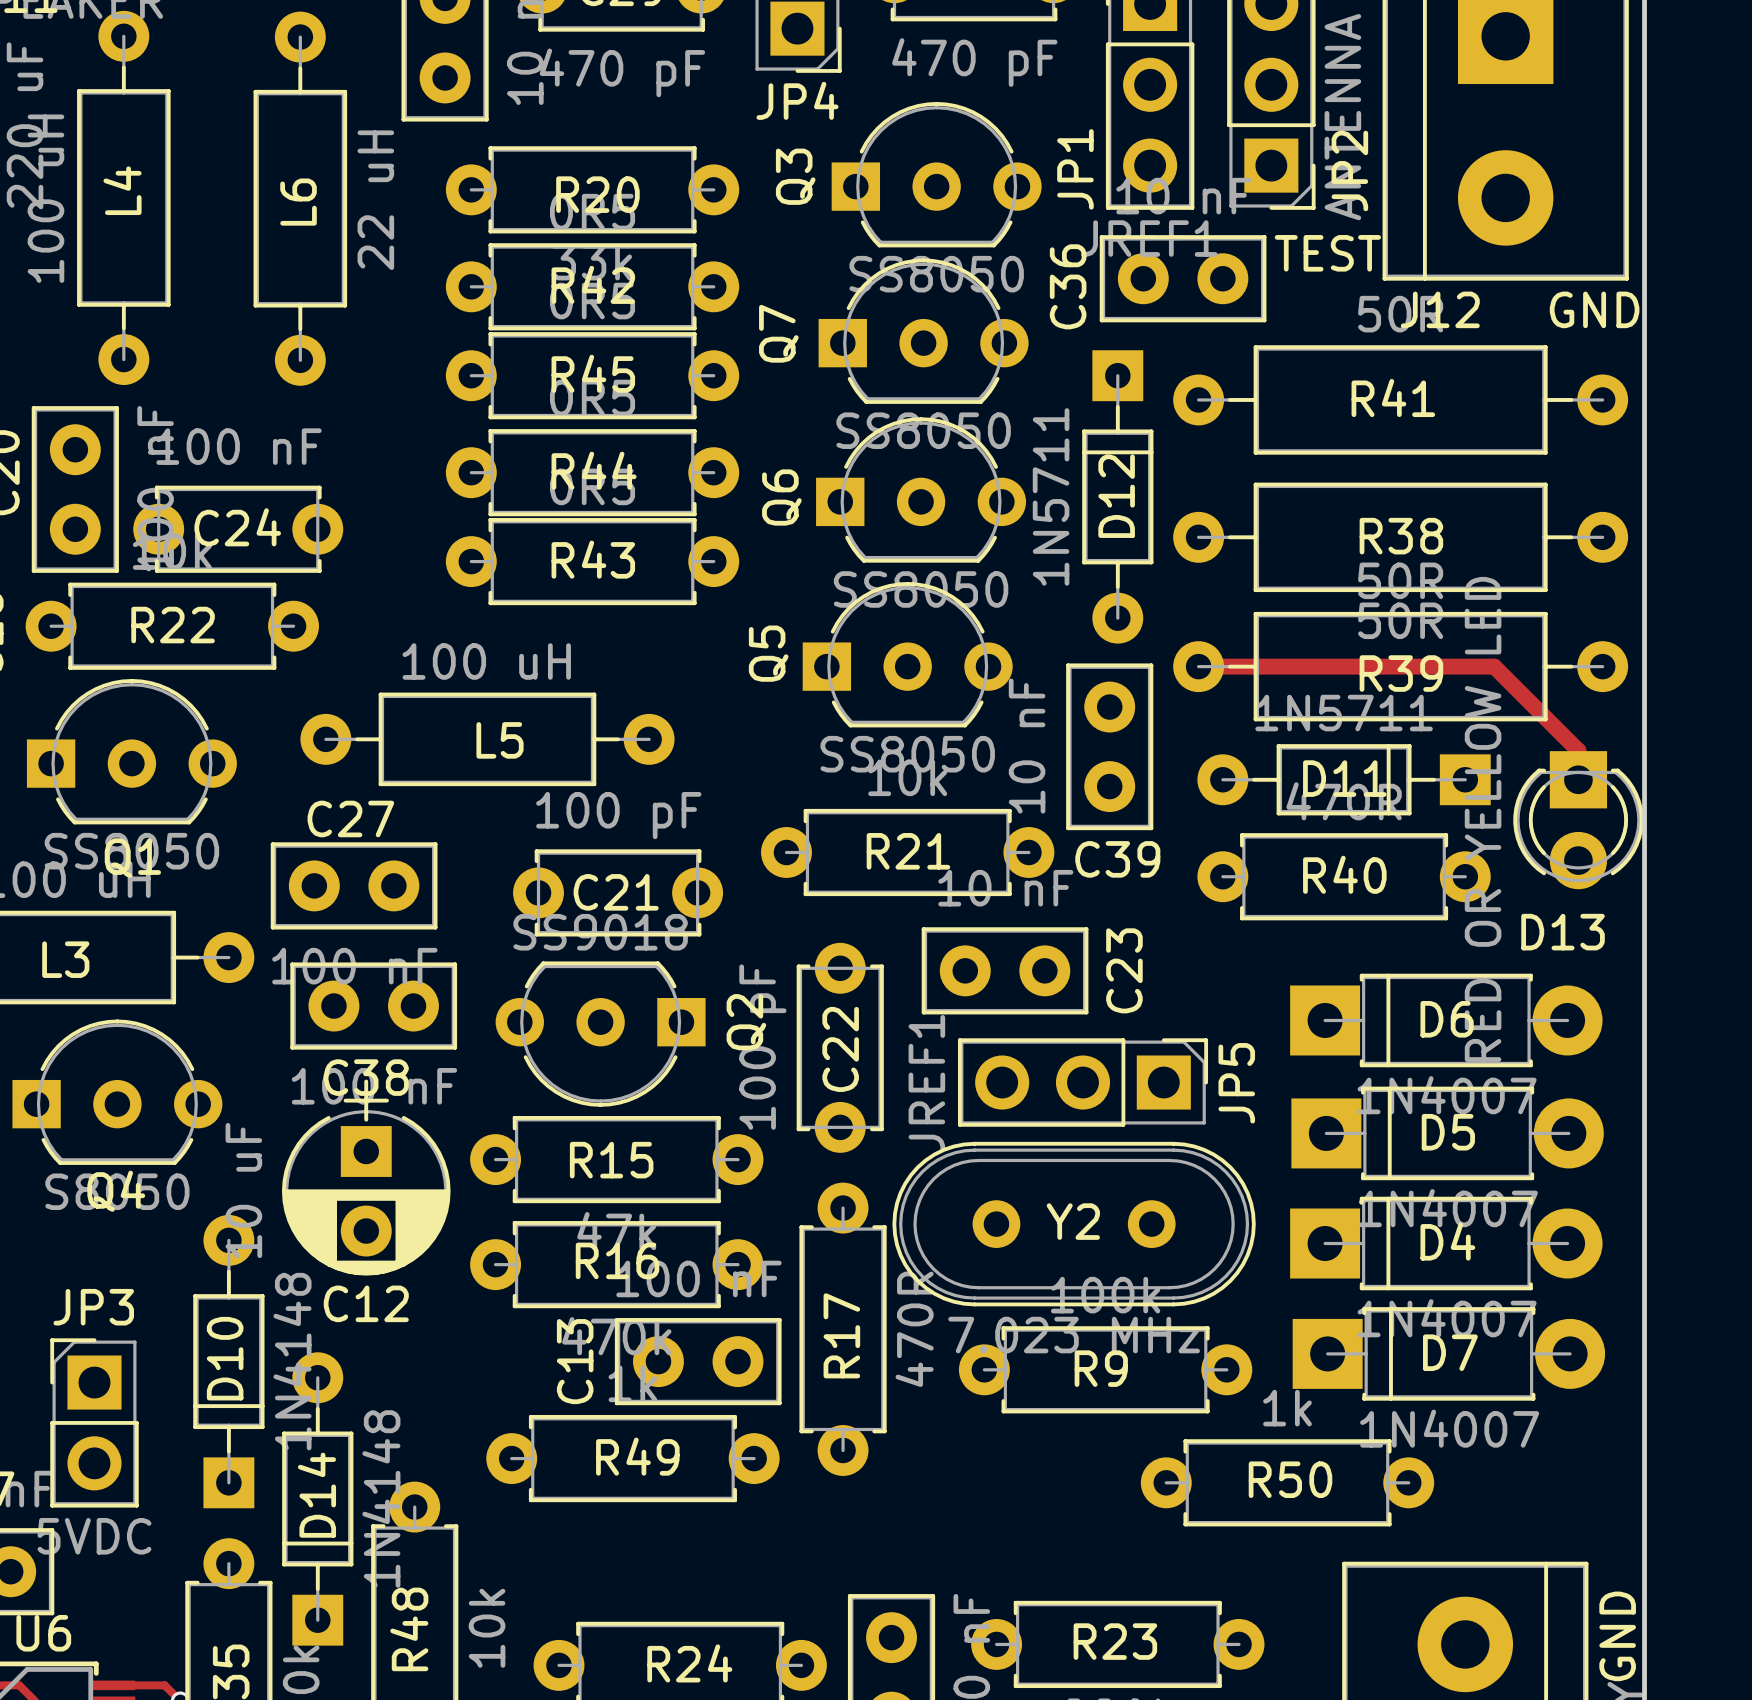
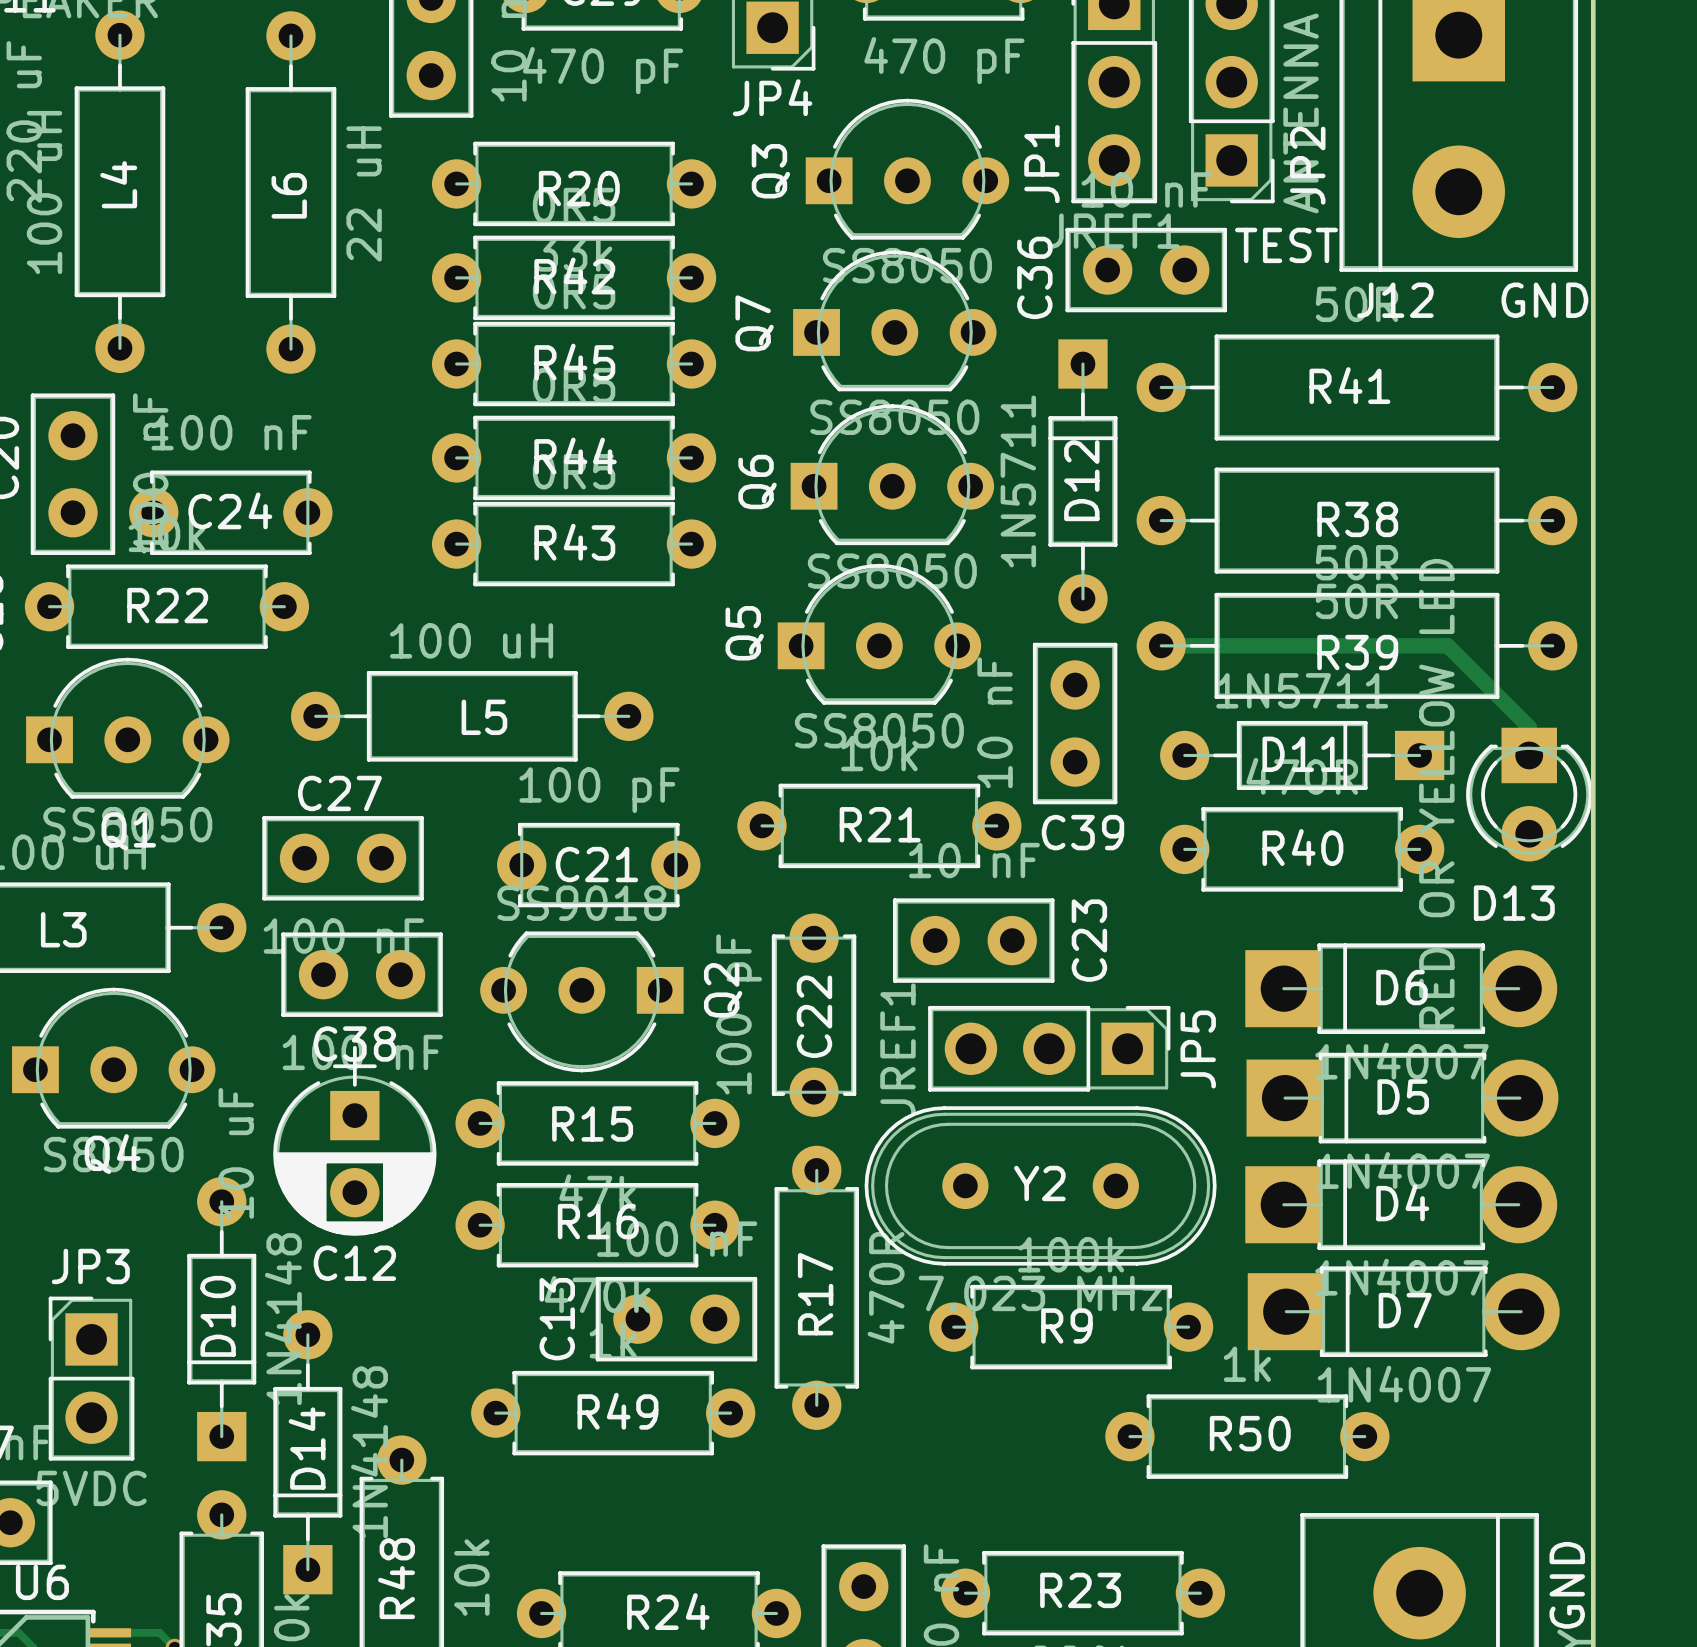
D6 footprint: [1290, 973, 1603, 1068] -> [1245, 943, 1558, 1034]
D5 footprint: [1291, 1086, 1604, 1181] -> [1246, 1052, 1559, 1144]
D4 footprint: [1290, 1196, 1603, 1291] -> [1245, 1159, 1558, 1251]
D7 footprint: [1292, 1307, 1606, 1401] -> [1247, 1266, 1560, 1358]

